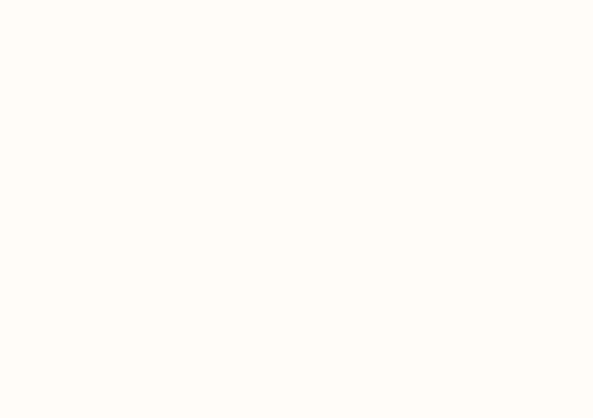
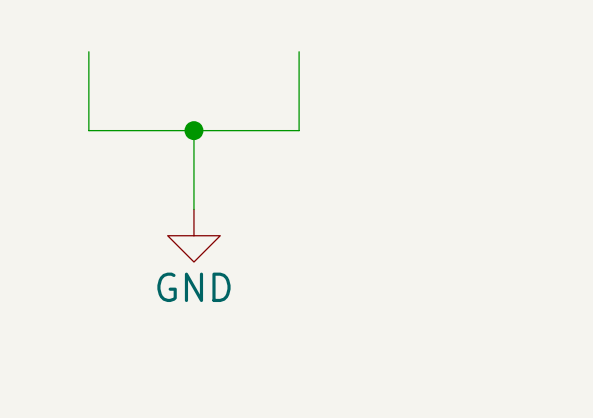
wire: none -> (88, 51) (88, 130) (299, 130) (299, 51)
wire: none -> (193, 130) (193, 209)
junction: none -> (193, 130)
power symbol: none -> GND (193, 235)

